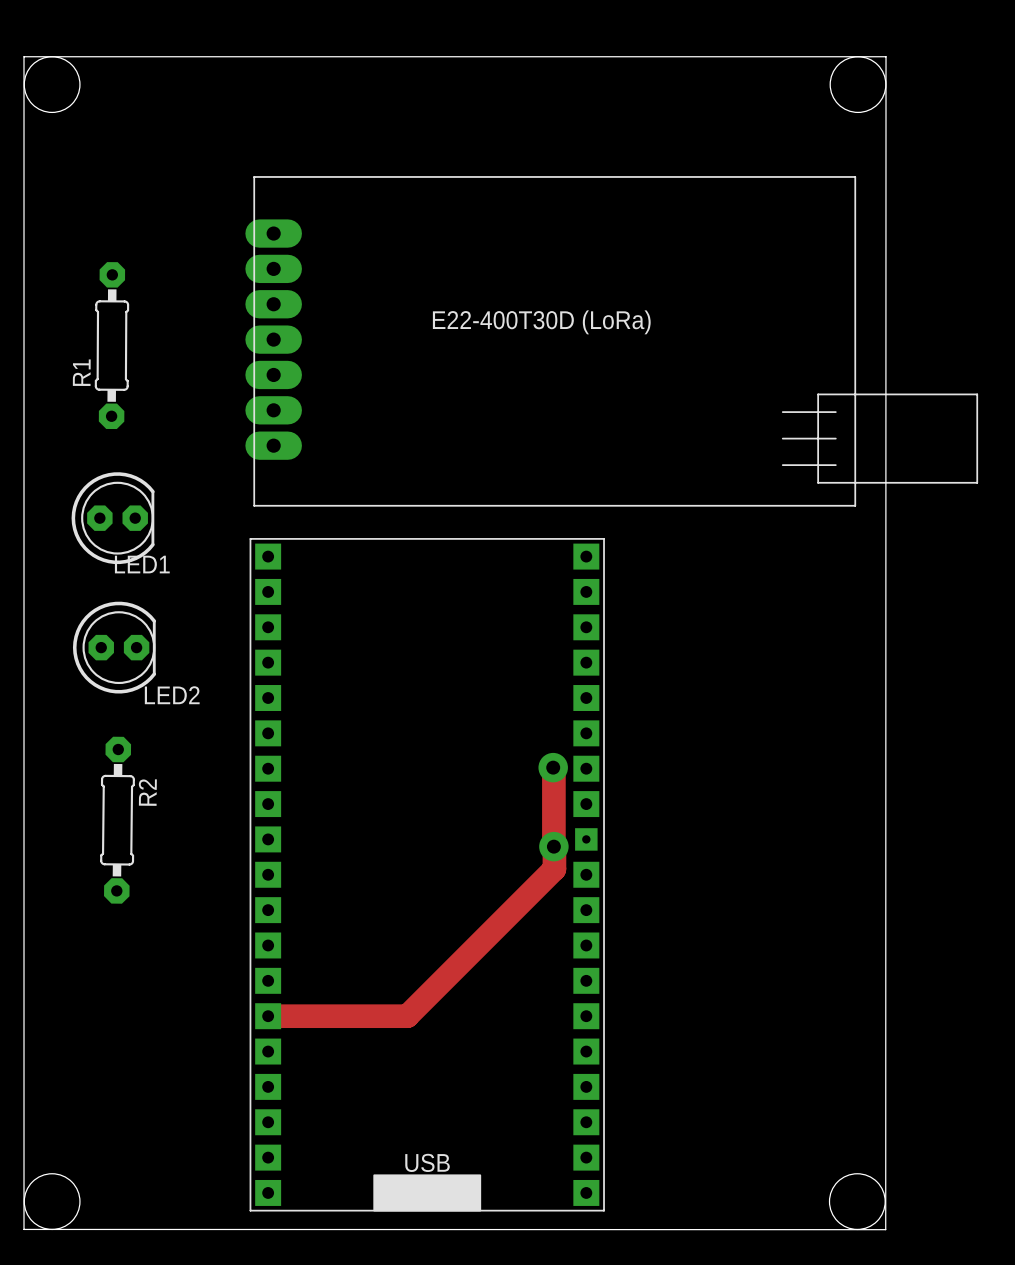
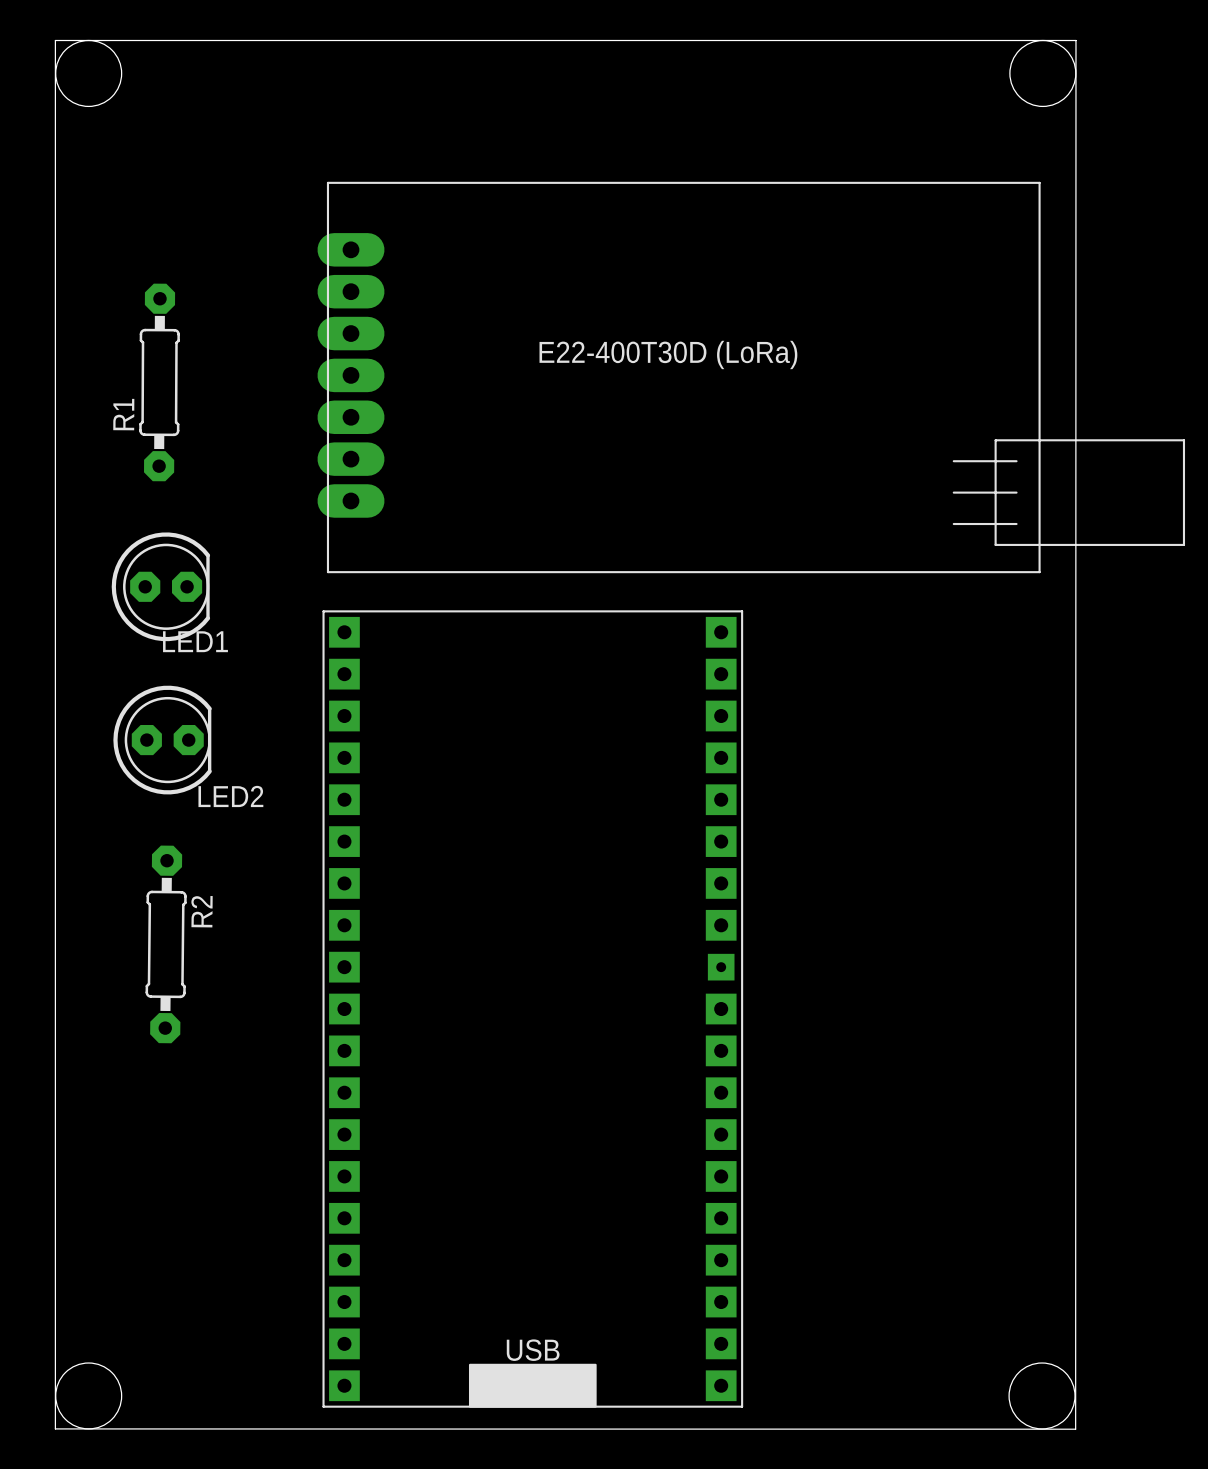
track: (553, 767) (554, 869) (407, 1016) (268, 1016) -> none
via: (553, 767) -> none
via: (553, 846) -> none

